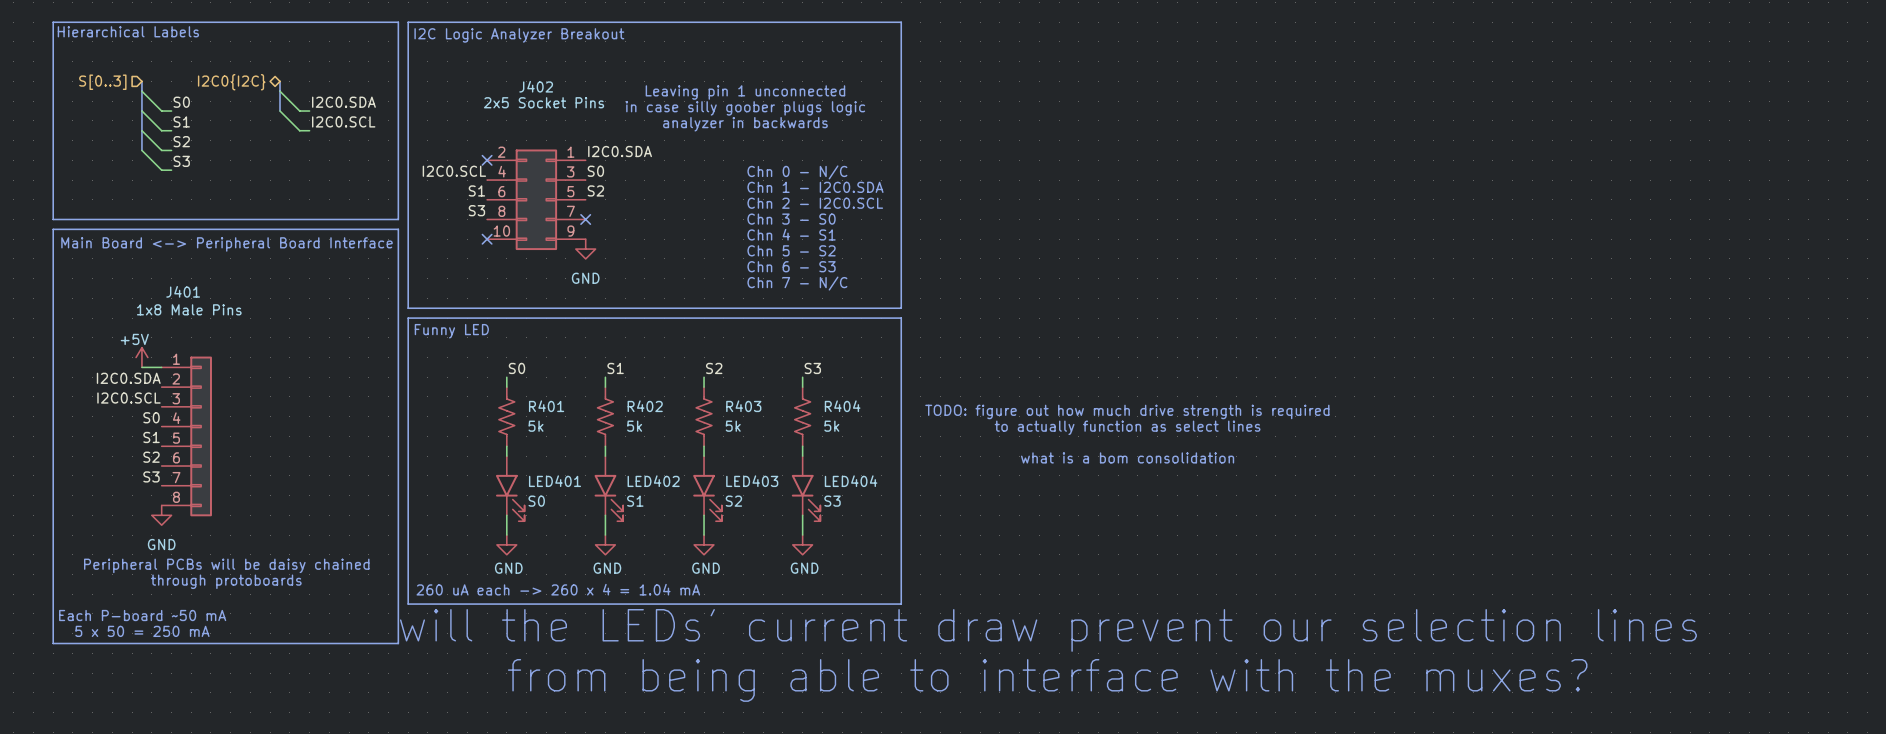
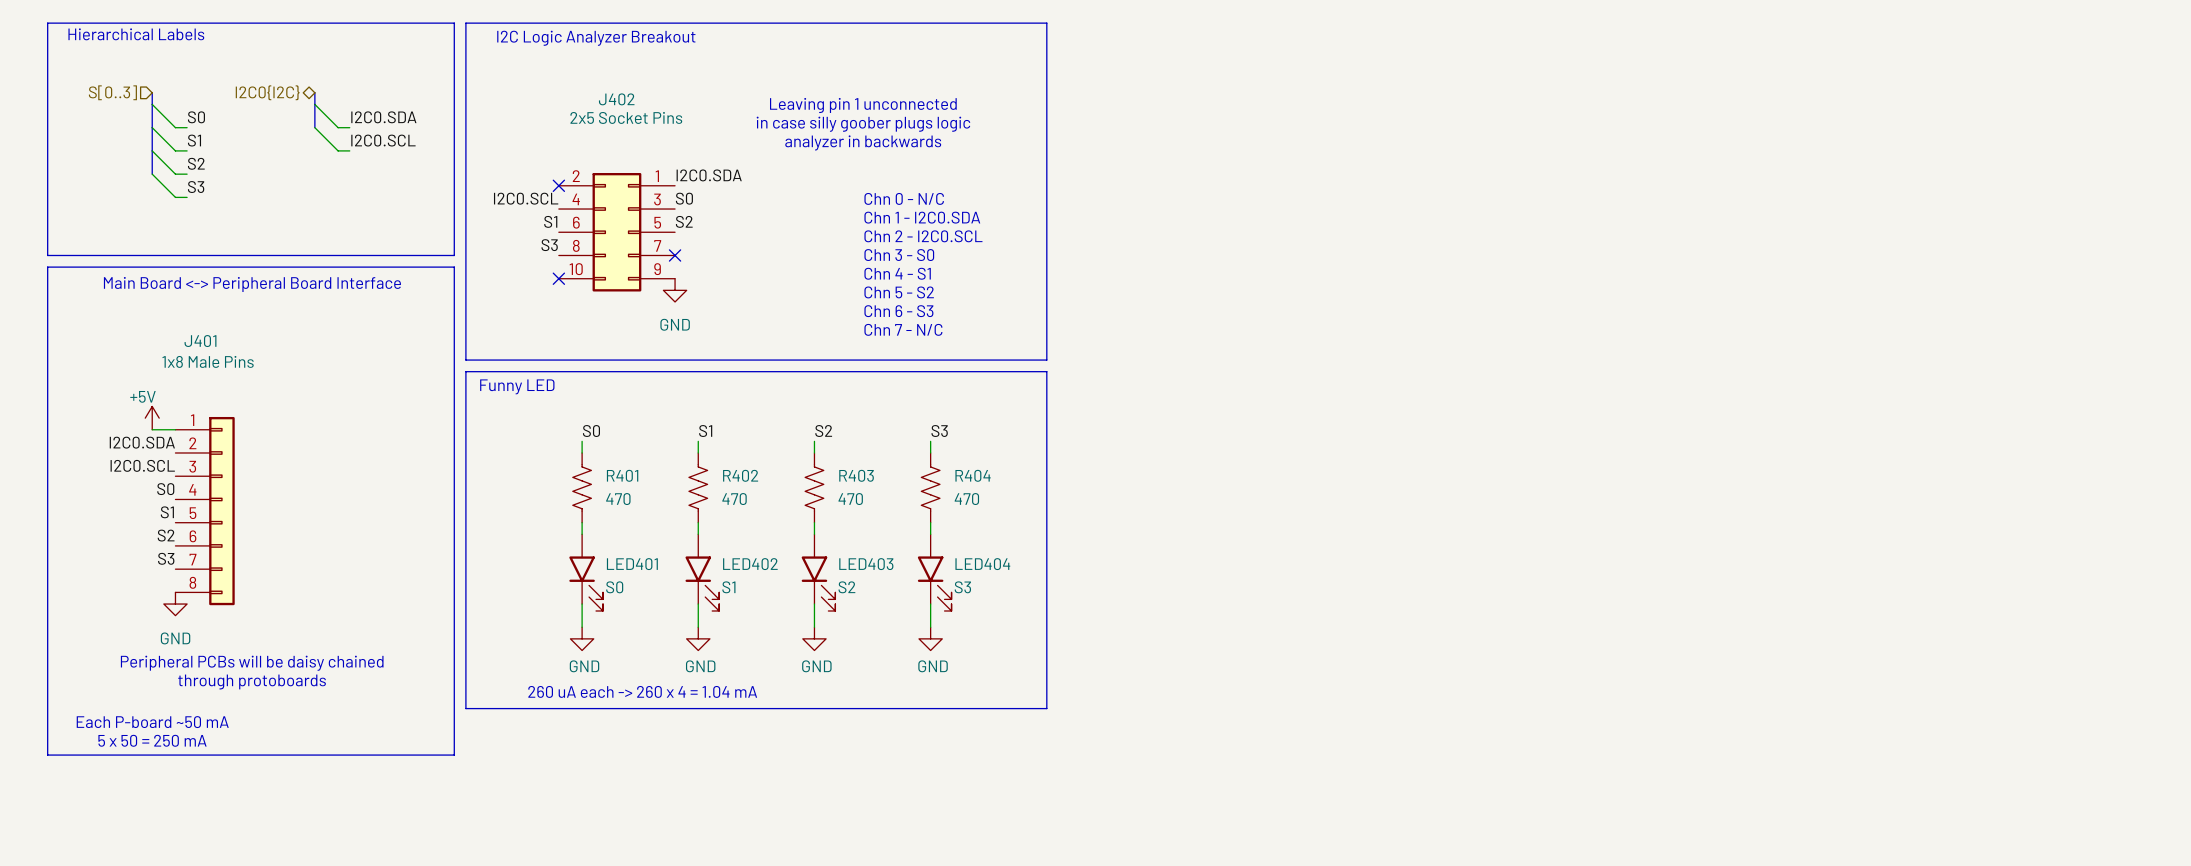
text: TODO: figure out how much drive strength is required (1127, 411) -> none
R401 value: 5k (536, 426) -> 470 (618, 499)
R402 value: 5k (634, 426) -> 470 (734, 499)
R403 value: 5k (733, 426) -> 470 (850, 499)
R404 value: 5k (831, 426) -> 470 (966, 499)
text: to actually function as select lines (1127, 427) -> none
text: what is a bom consolidation (1127, 457) -> none
text: will the LEDs' current draw prevent our selection lines (1048, 630) -> none
text: from being able to interface with the muxes? (1047, 680) -> none

